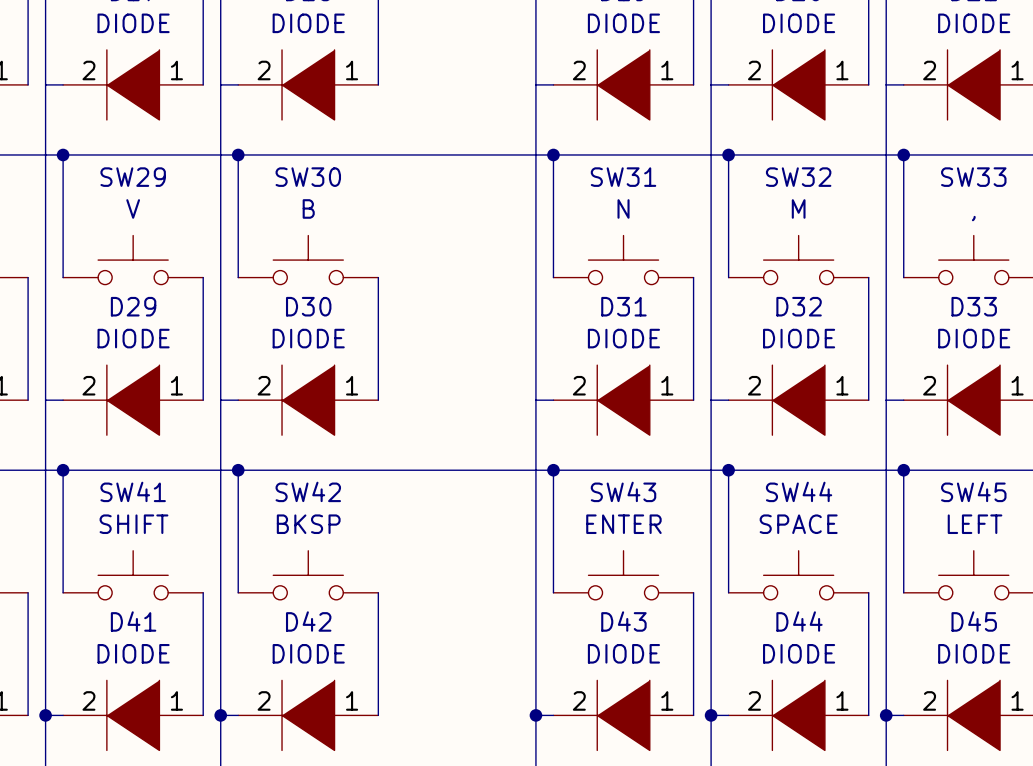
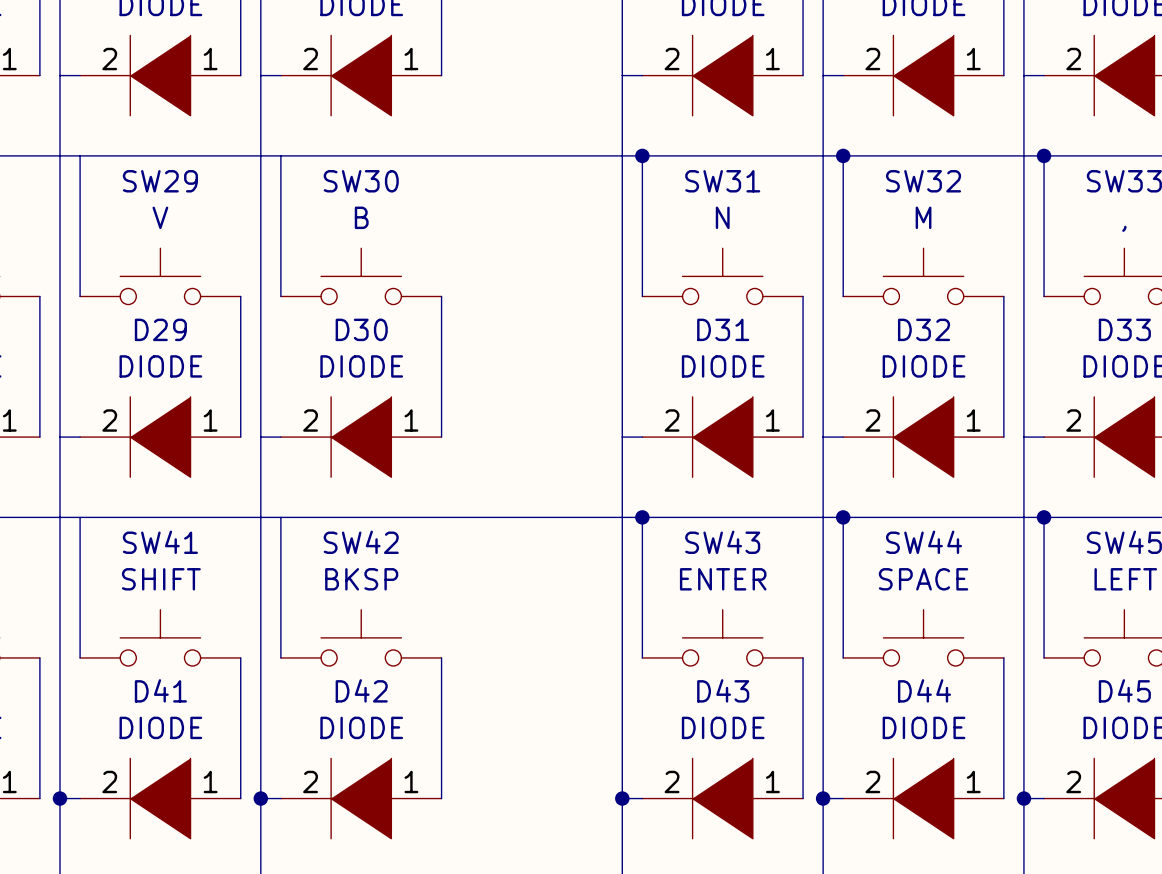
junction: (63, 154) -> none
junction: (238, 154) -> none
junction: (63, 470) -> none
junction: (238, 470) -> none

